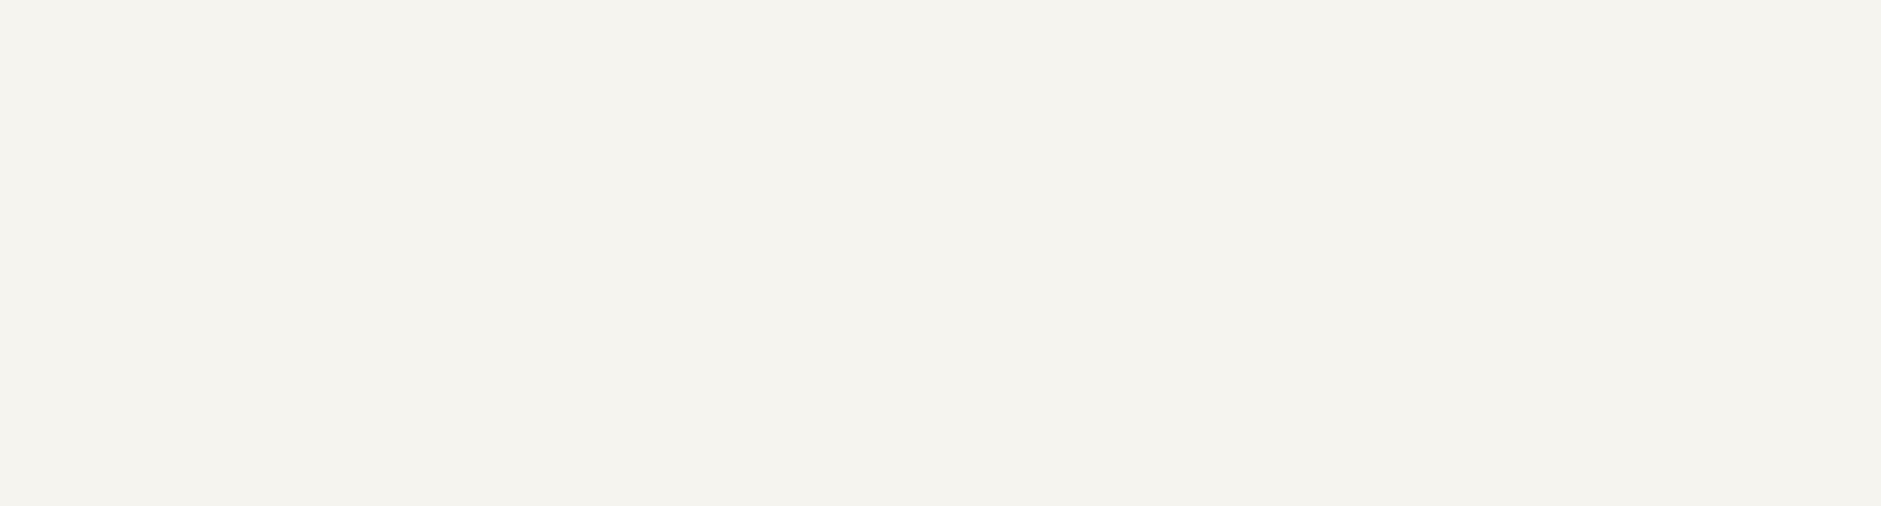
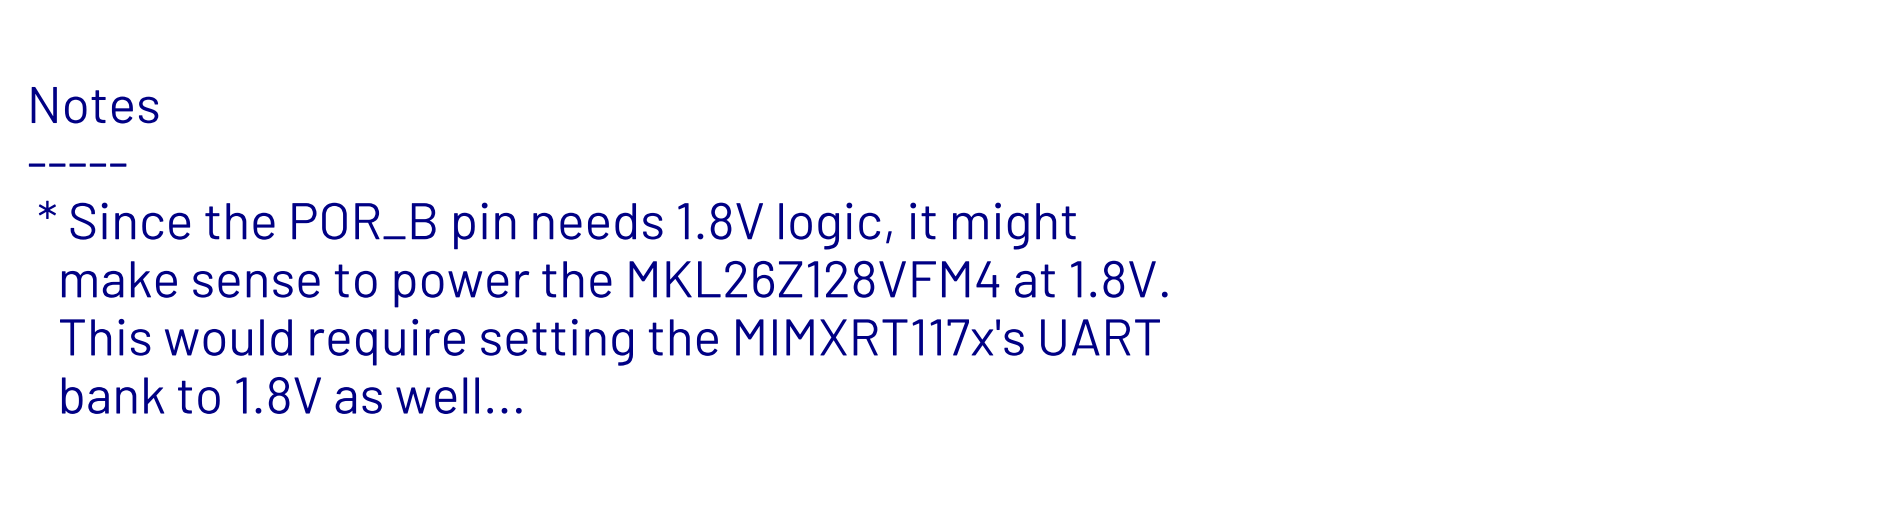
text: none -> Notes (95, 105)
text: none -> ----- (77, 165)
text: none -> * Since the POR_B pin needs 1.8V logic, it might (557, 225)
text: none -> make sense to power the MKL26Z128VFM4 at 1.8V. (614, 284)
text: none -> This would require setting the MIMXRT117x's UART (610, 342)
text: none -> bank to 1.8V as well... (291, 395)

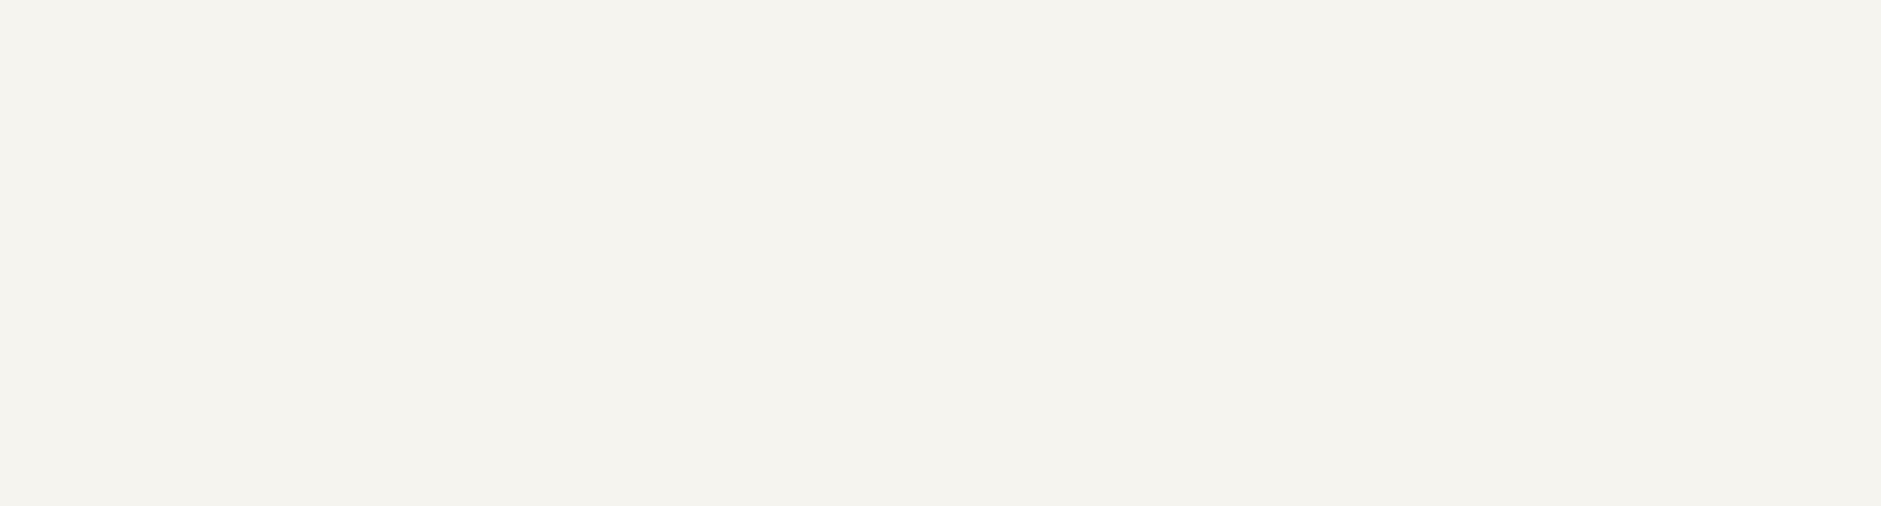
text: Notes (95, 105) -> none
text: ----- (77, 165) -> none
text: * Since the POR_B pin needs 1.8V logic, it might (557, 225) -> none
text: make sense to power the MKL26Z128VFM4 at 1.8V. (614, 284) -> none
text: This would require setting the MIMXRT117x's UART (610, 342) -> none
text: bank to 1.8V as well... (291, 395) -> none

